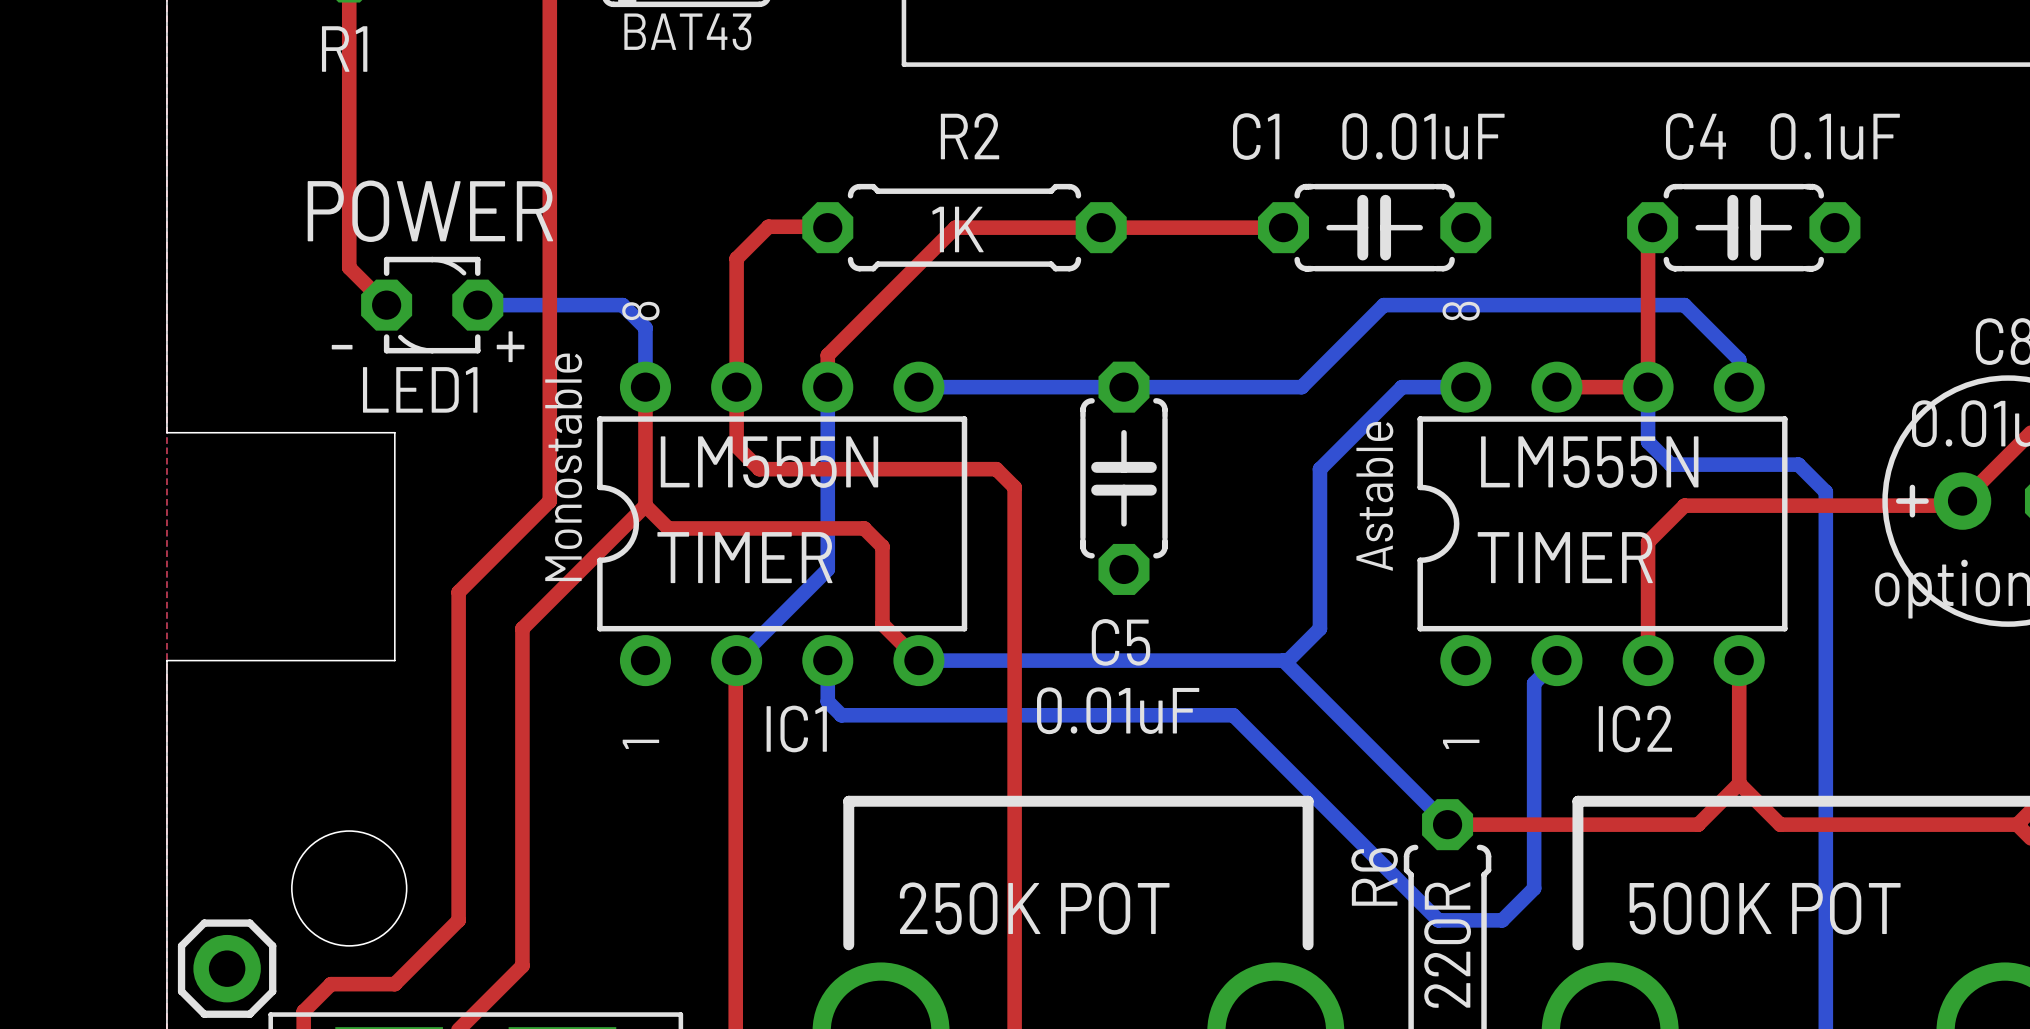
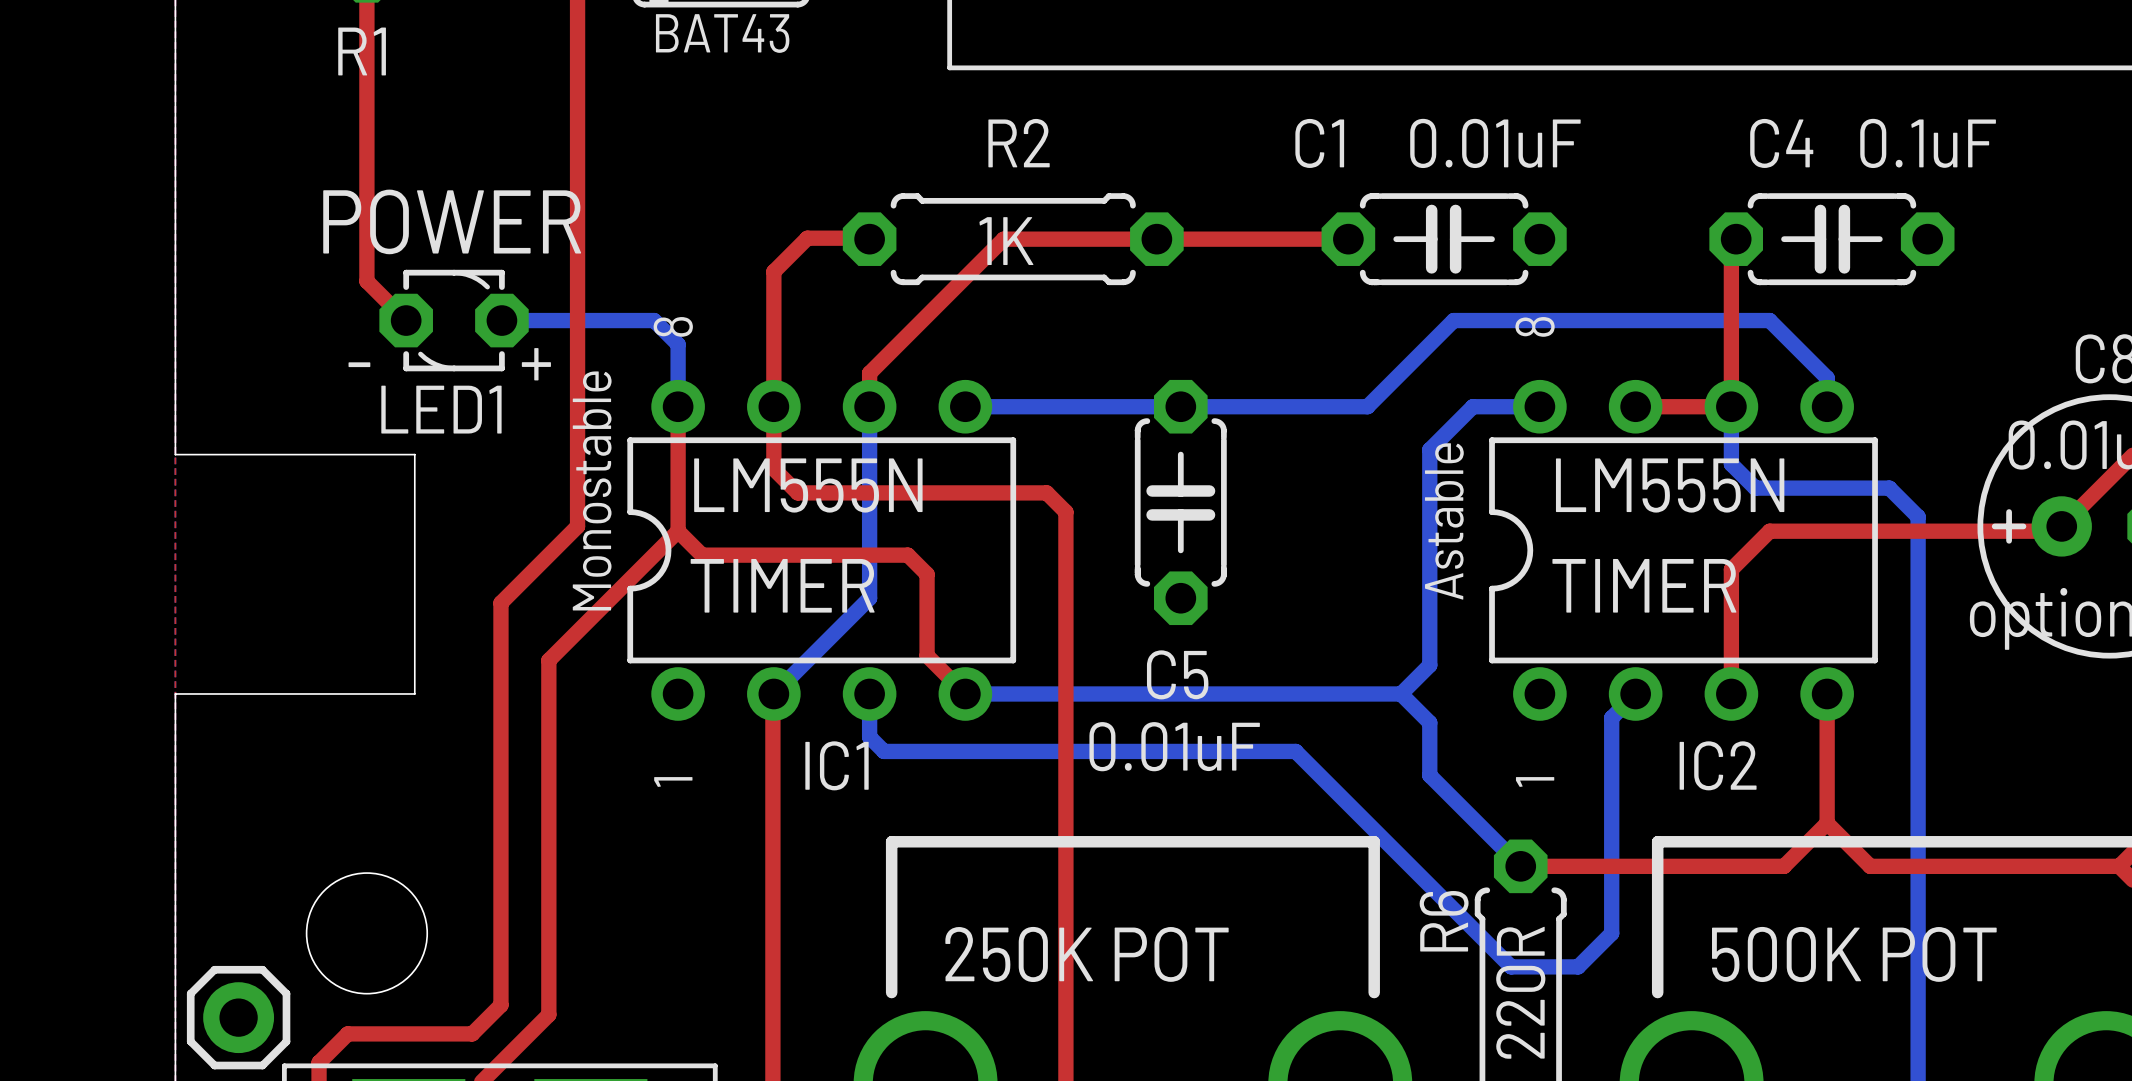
bottom track: (1360, 428) (1319, 469) (1319, 628) (1288, 660) -> (1429, 449) (1429, 665) (1401, 693)
top track: (476, 574) (458, 592) (458, 920) (394, 984) -> (500, 603) (500, 1005) (472, 1033) (414, 1033)
bottom track: (1283, 660) (1360, 738) -> (1401, 693) (1429, 722) (1429, 775)
bottom track: none -> (1353, 693) (1401, 693)

